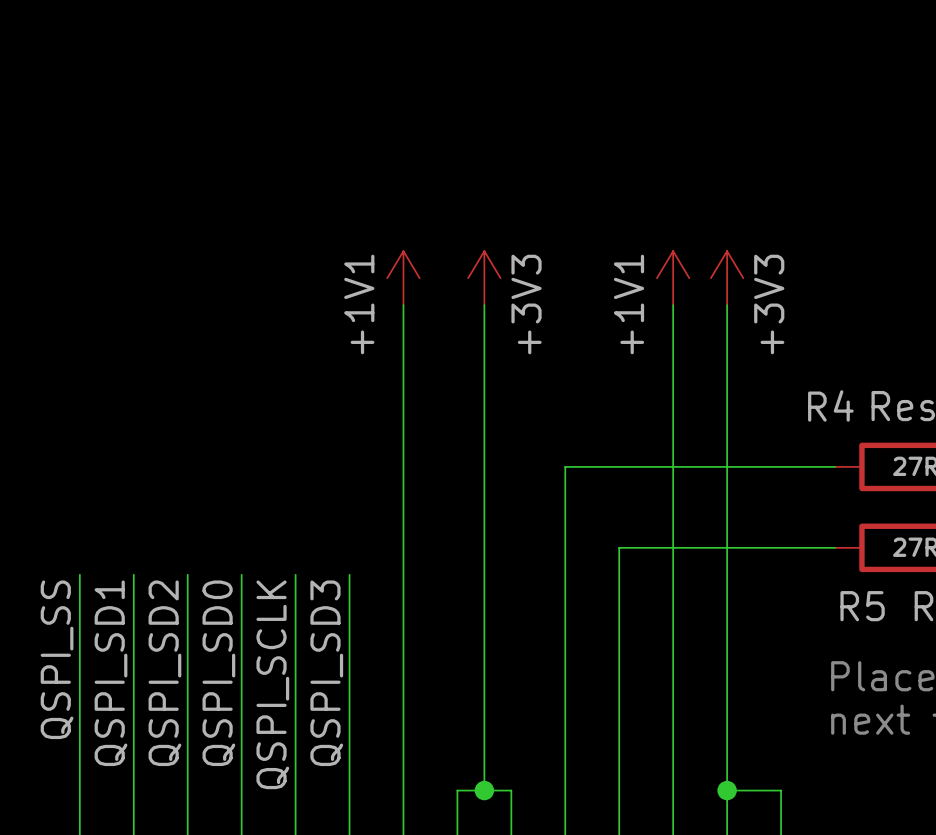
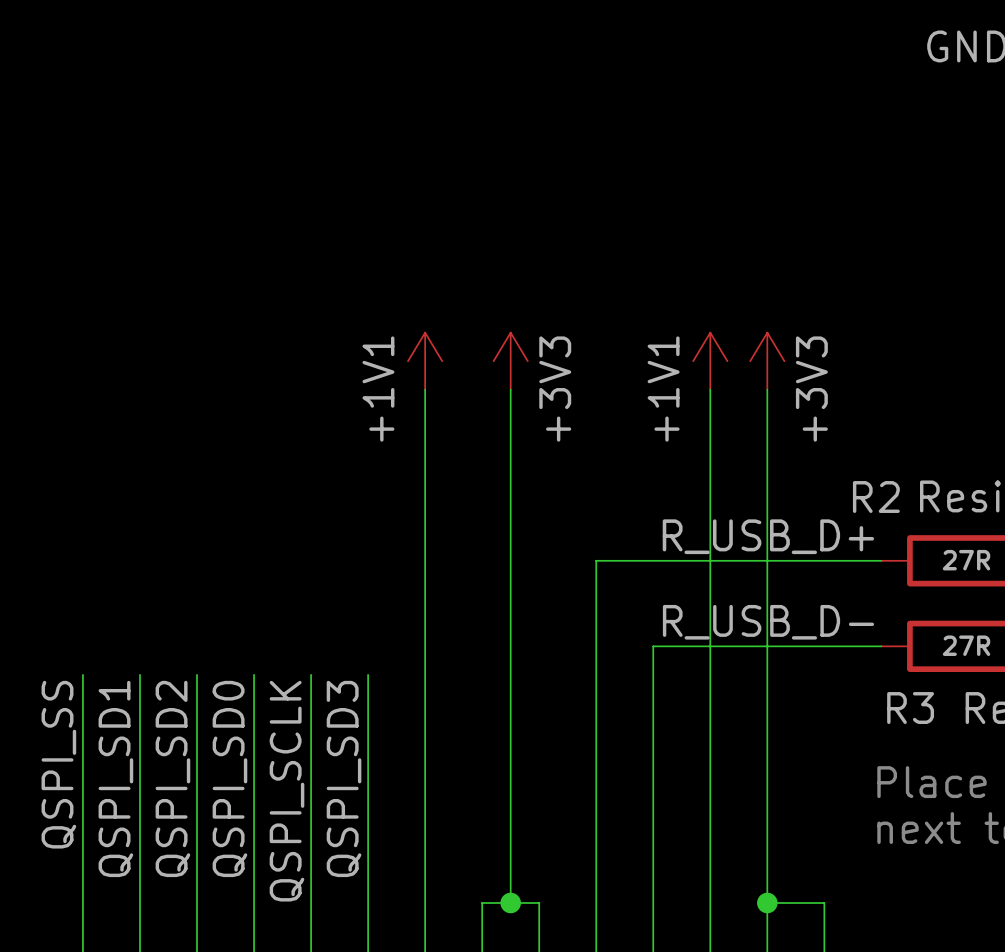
R4 name: R4 (830, 405) -> R2 (876, 497)
label: none -> R_USB_D+ (768, 536)
label: none -> R_USB_D- (768, 622)
R5 name: R5 (862, 606) -> R3 (910, 708)

